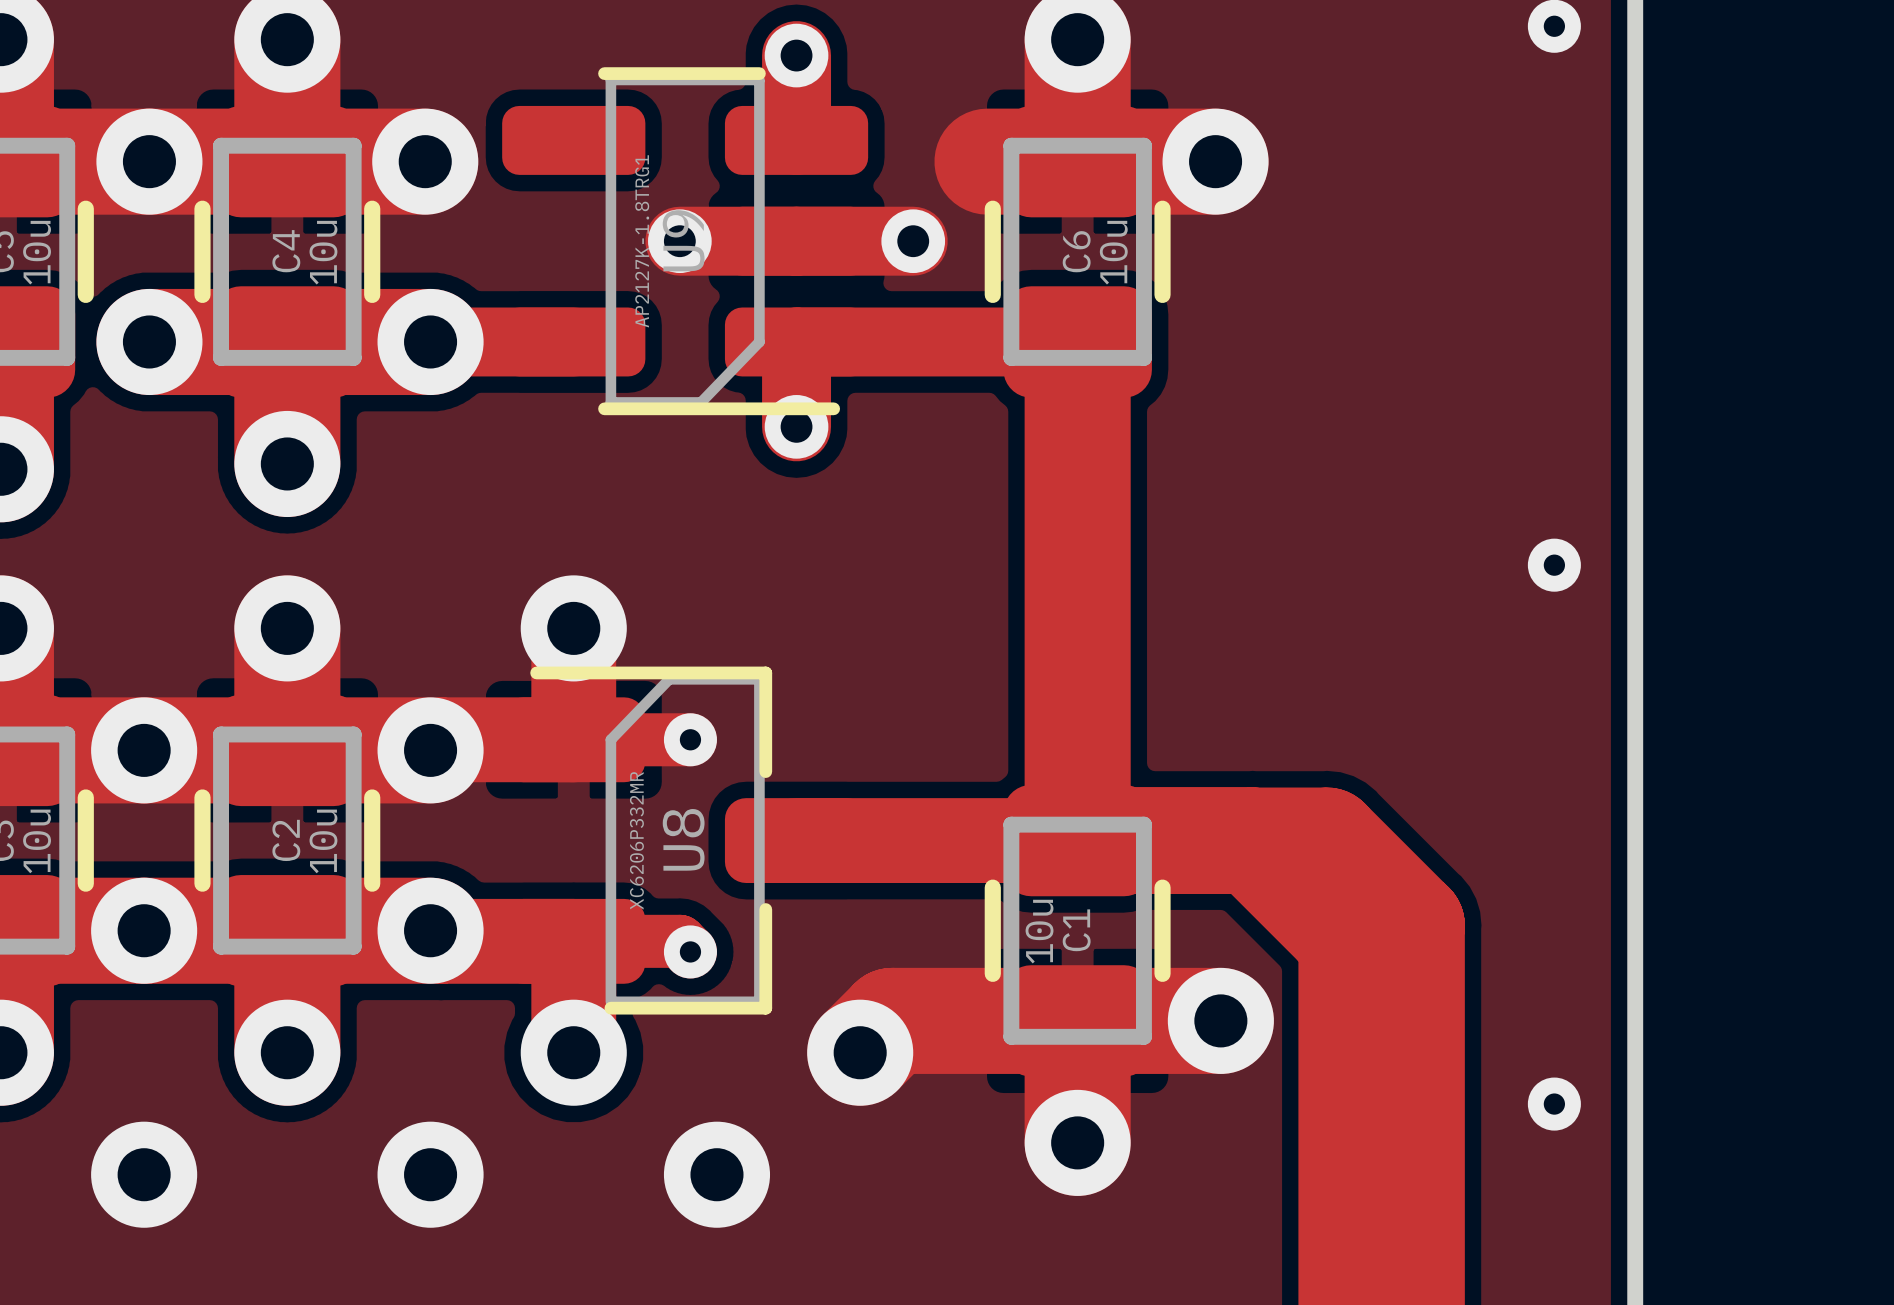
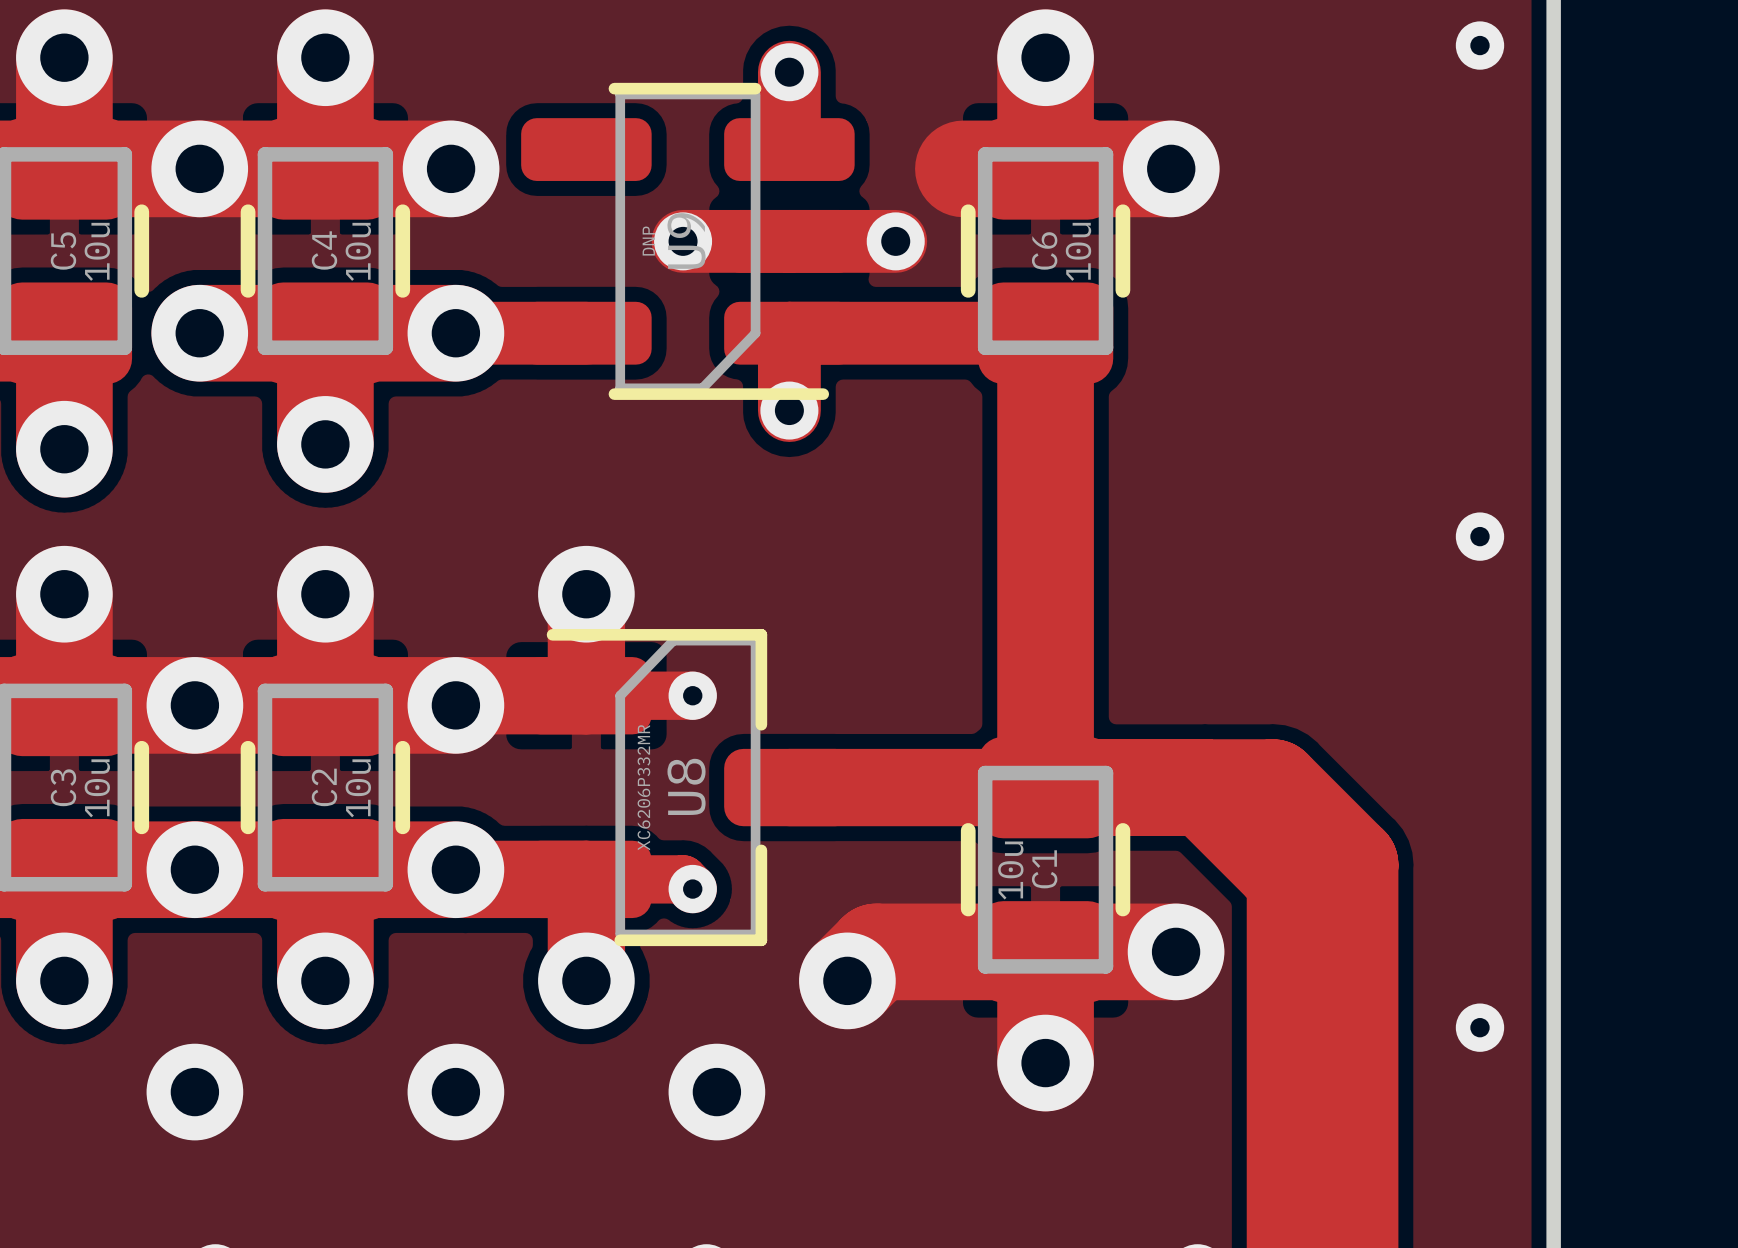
part value: AP2127K-1.8TRG1 (642, 241) -> DNP (648, 241)

